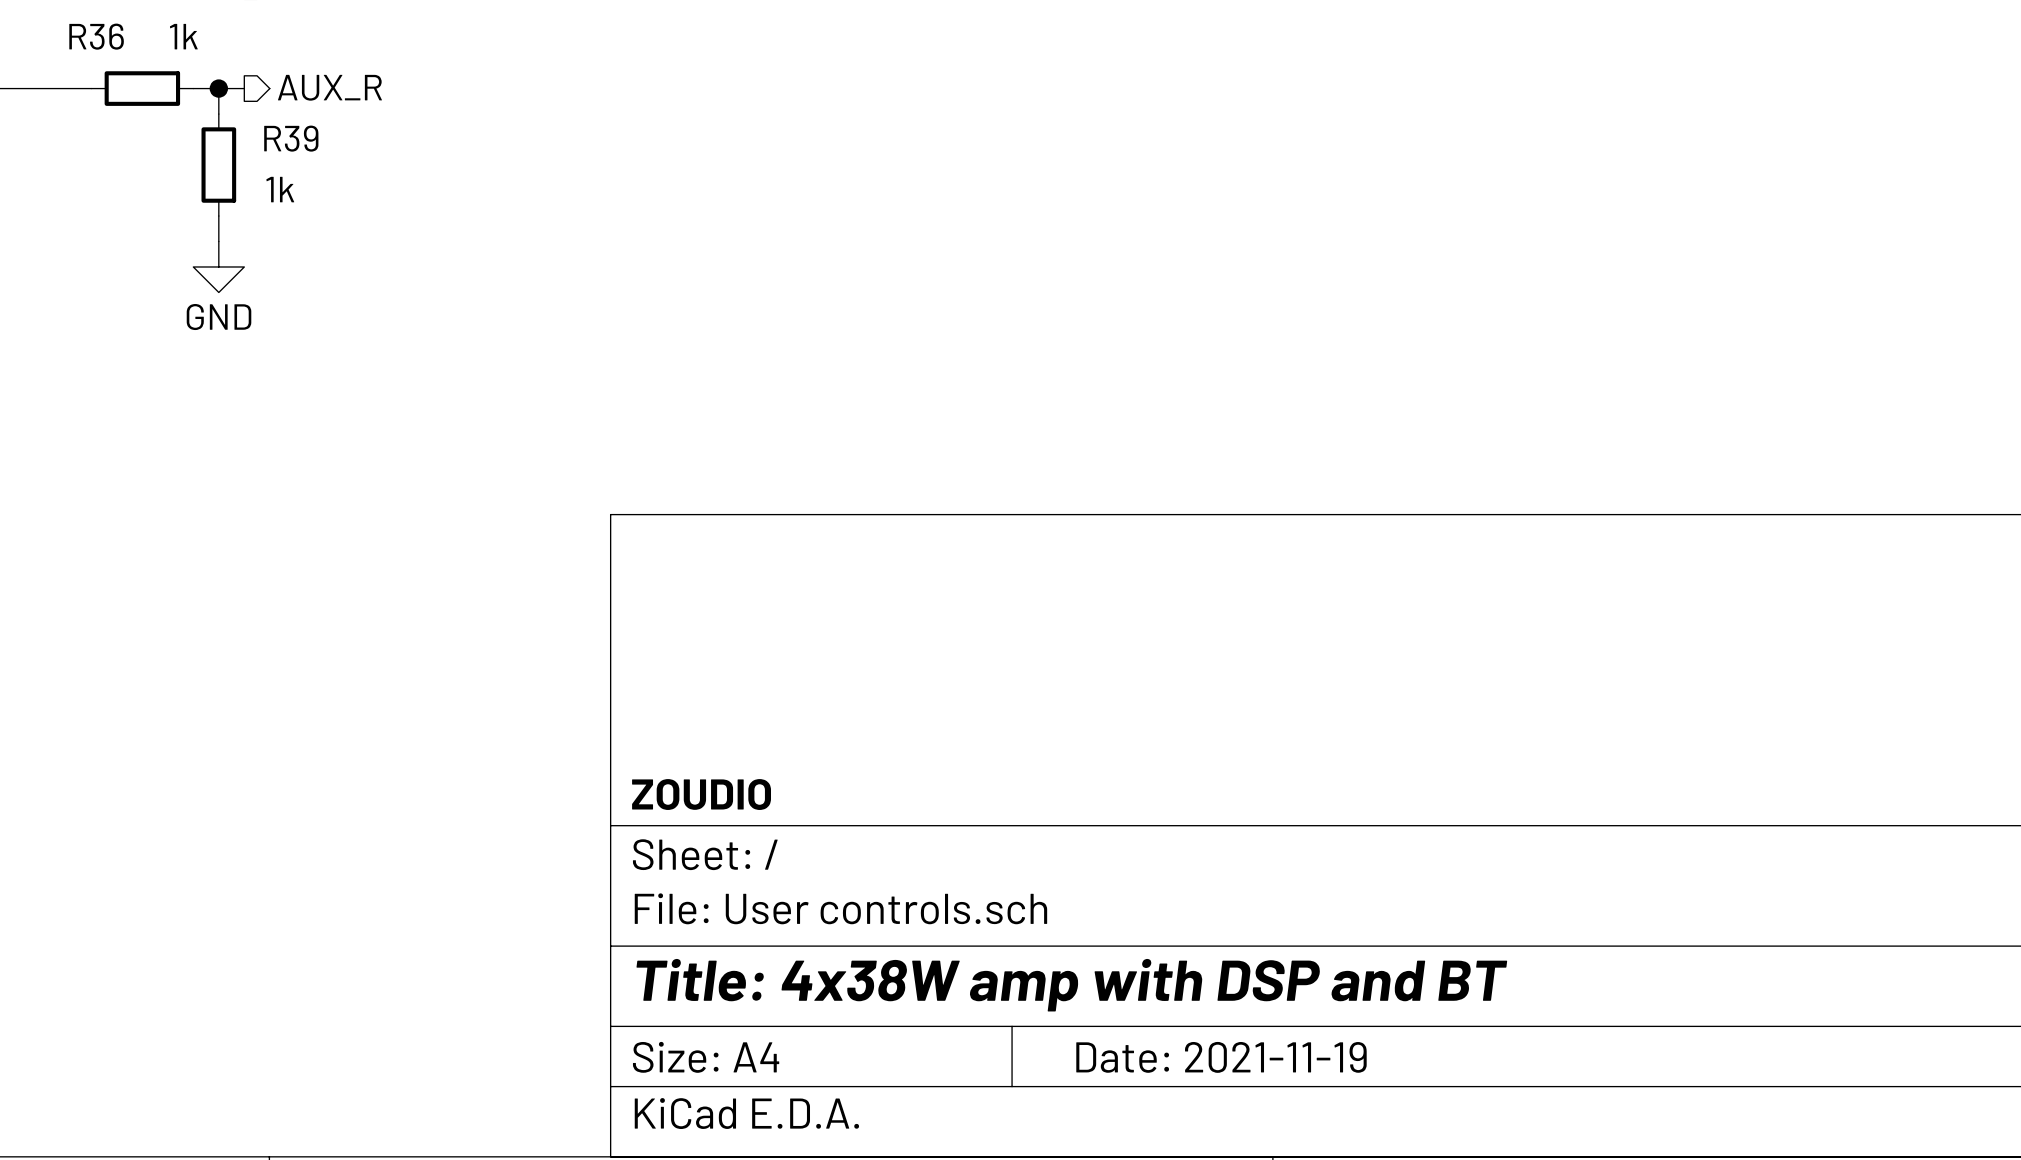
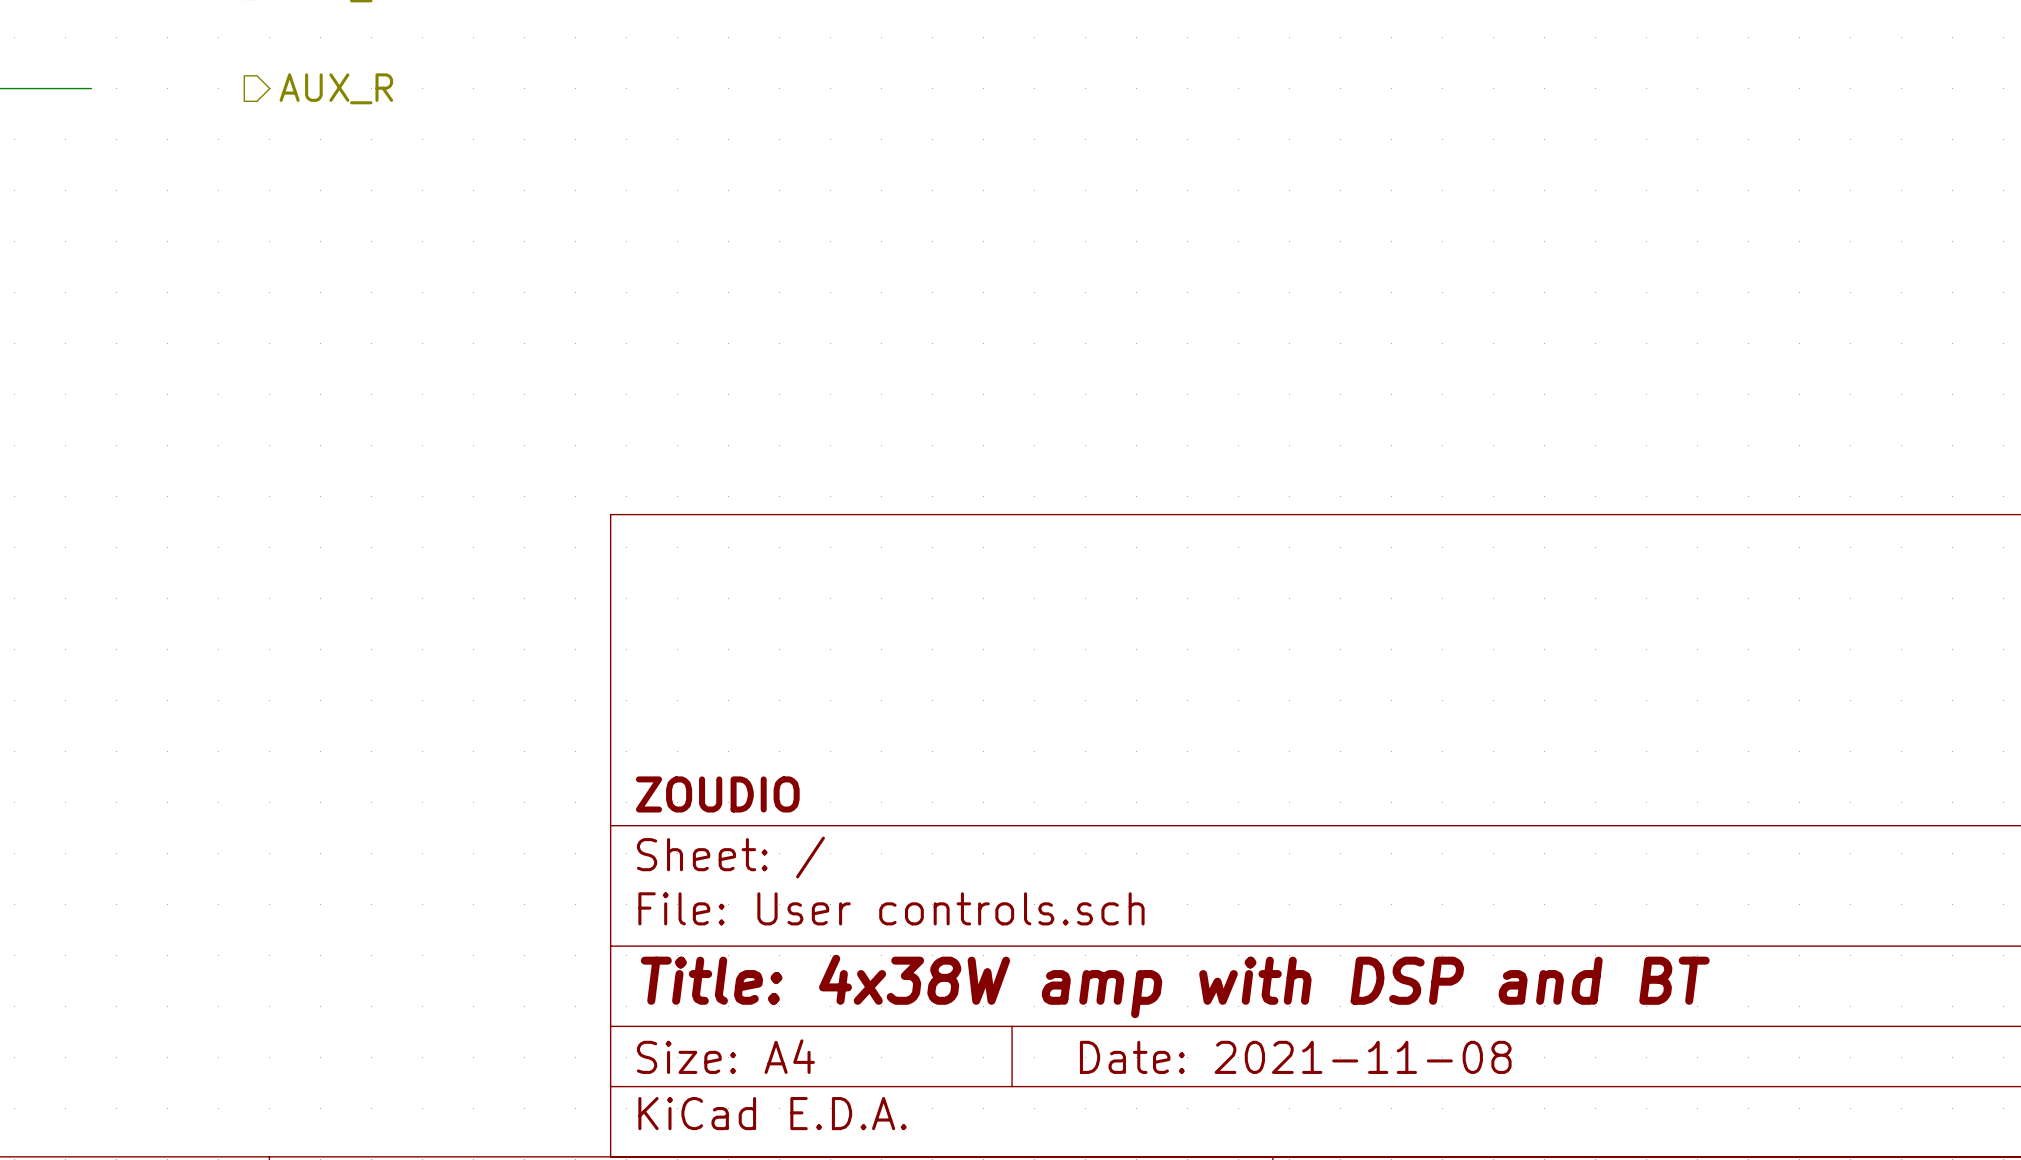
R36: 1k (142, 88) -> none
wire: (193, 88) (244, 88) -> none
wire: (218, 88) (218, 114) -> none
junction: (218, 88) -> none
R39: 1k (218, 165) -> none
wire: (218, 216) (218, 241) -> none
power symbol: GND (218, 266) -> none
title block: Date: 2021-11-19 (1221, 1057) -> Date: 2021-11-08 (1295, 1057)

